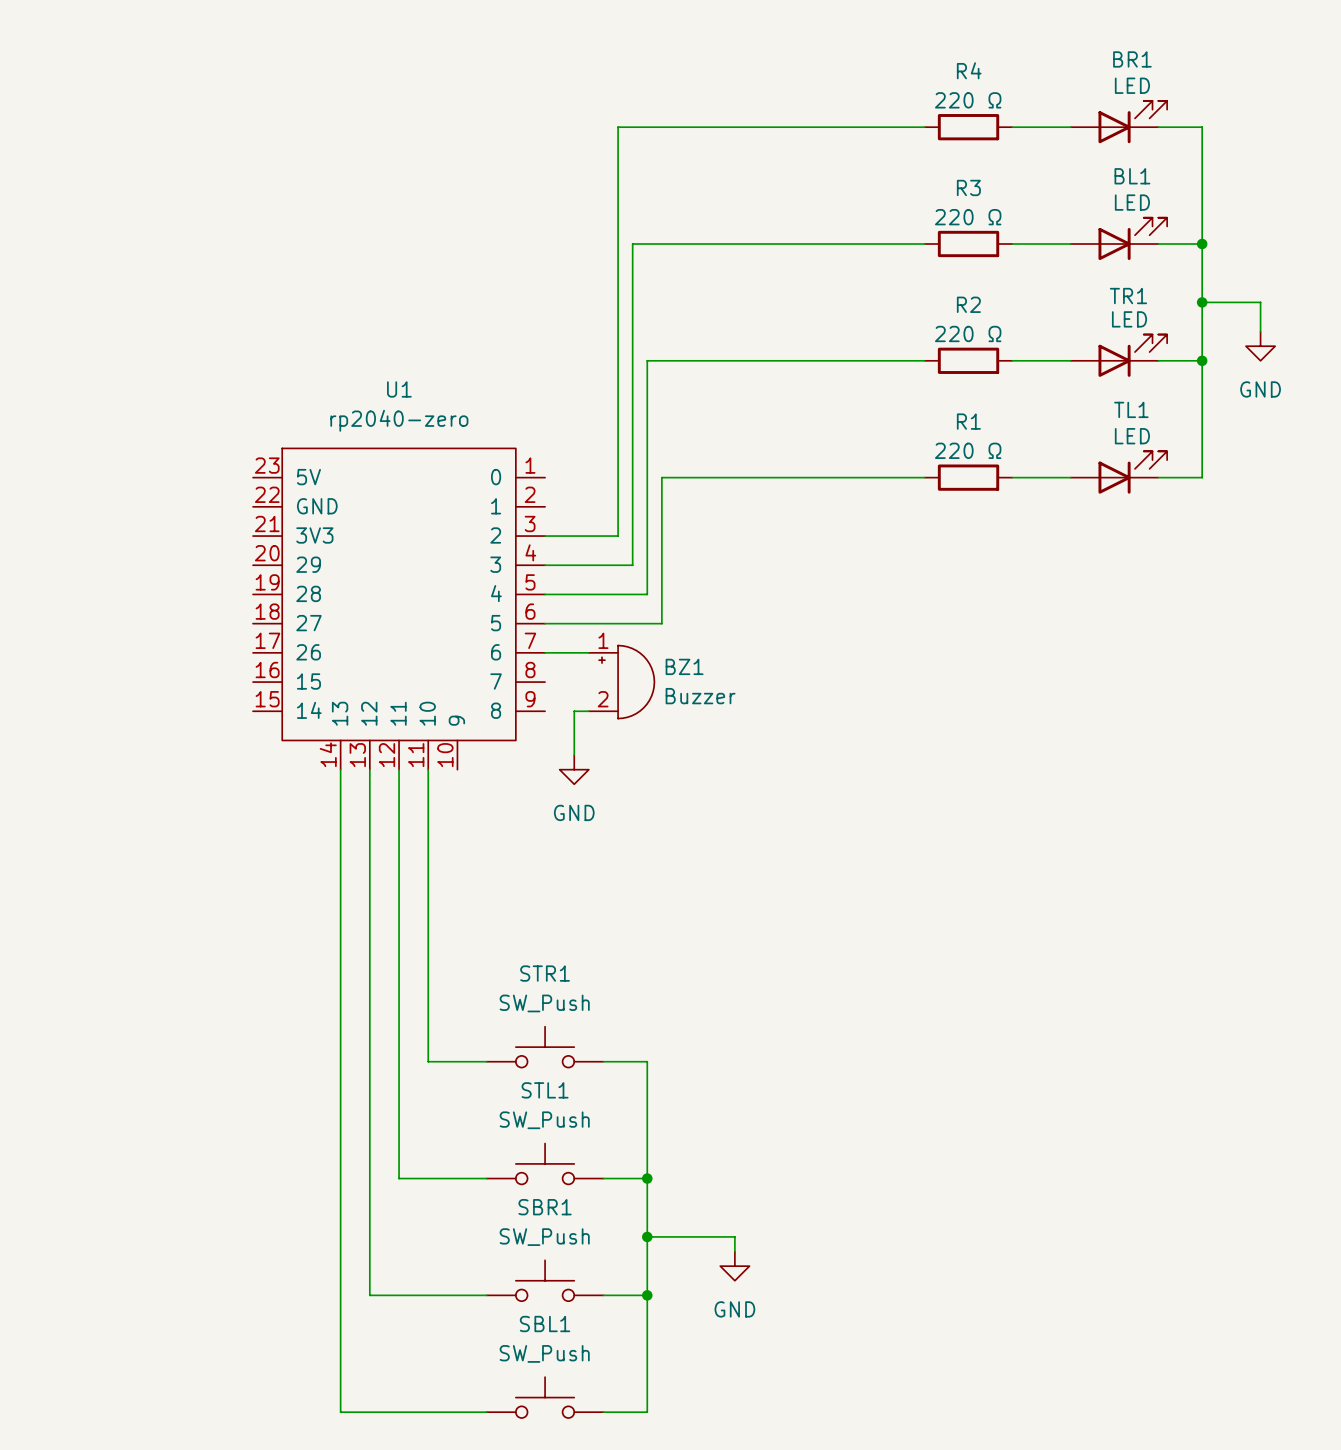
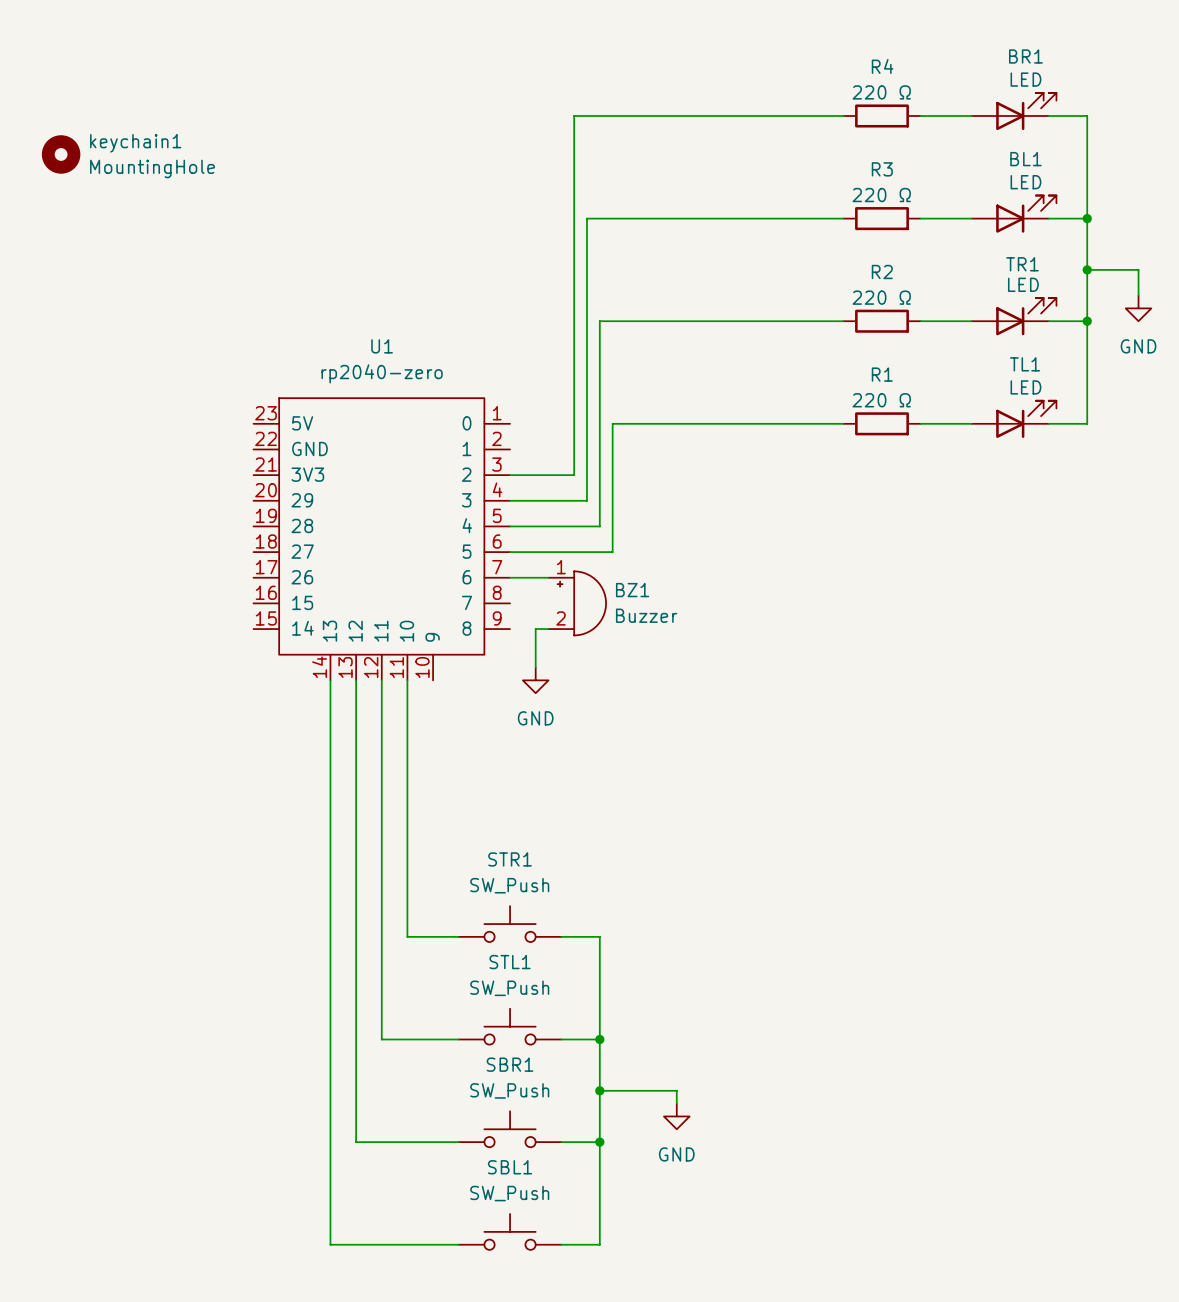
keychain1: none -> MountingHole (61, 154)

